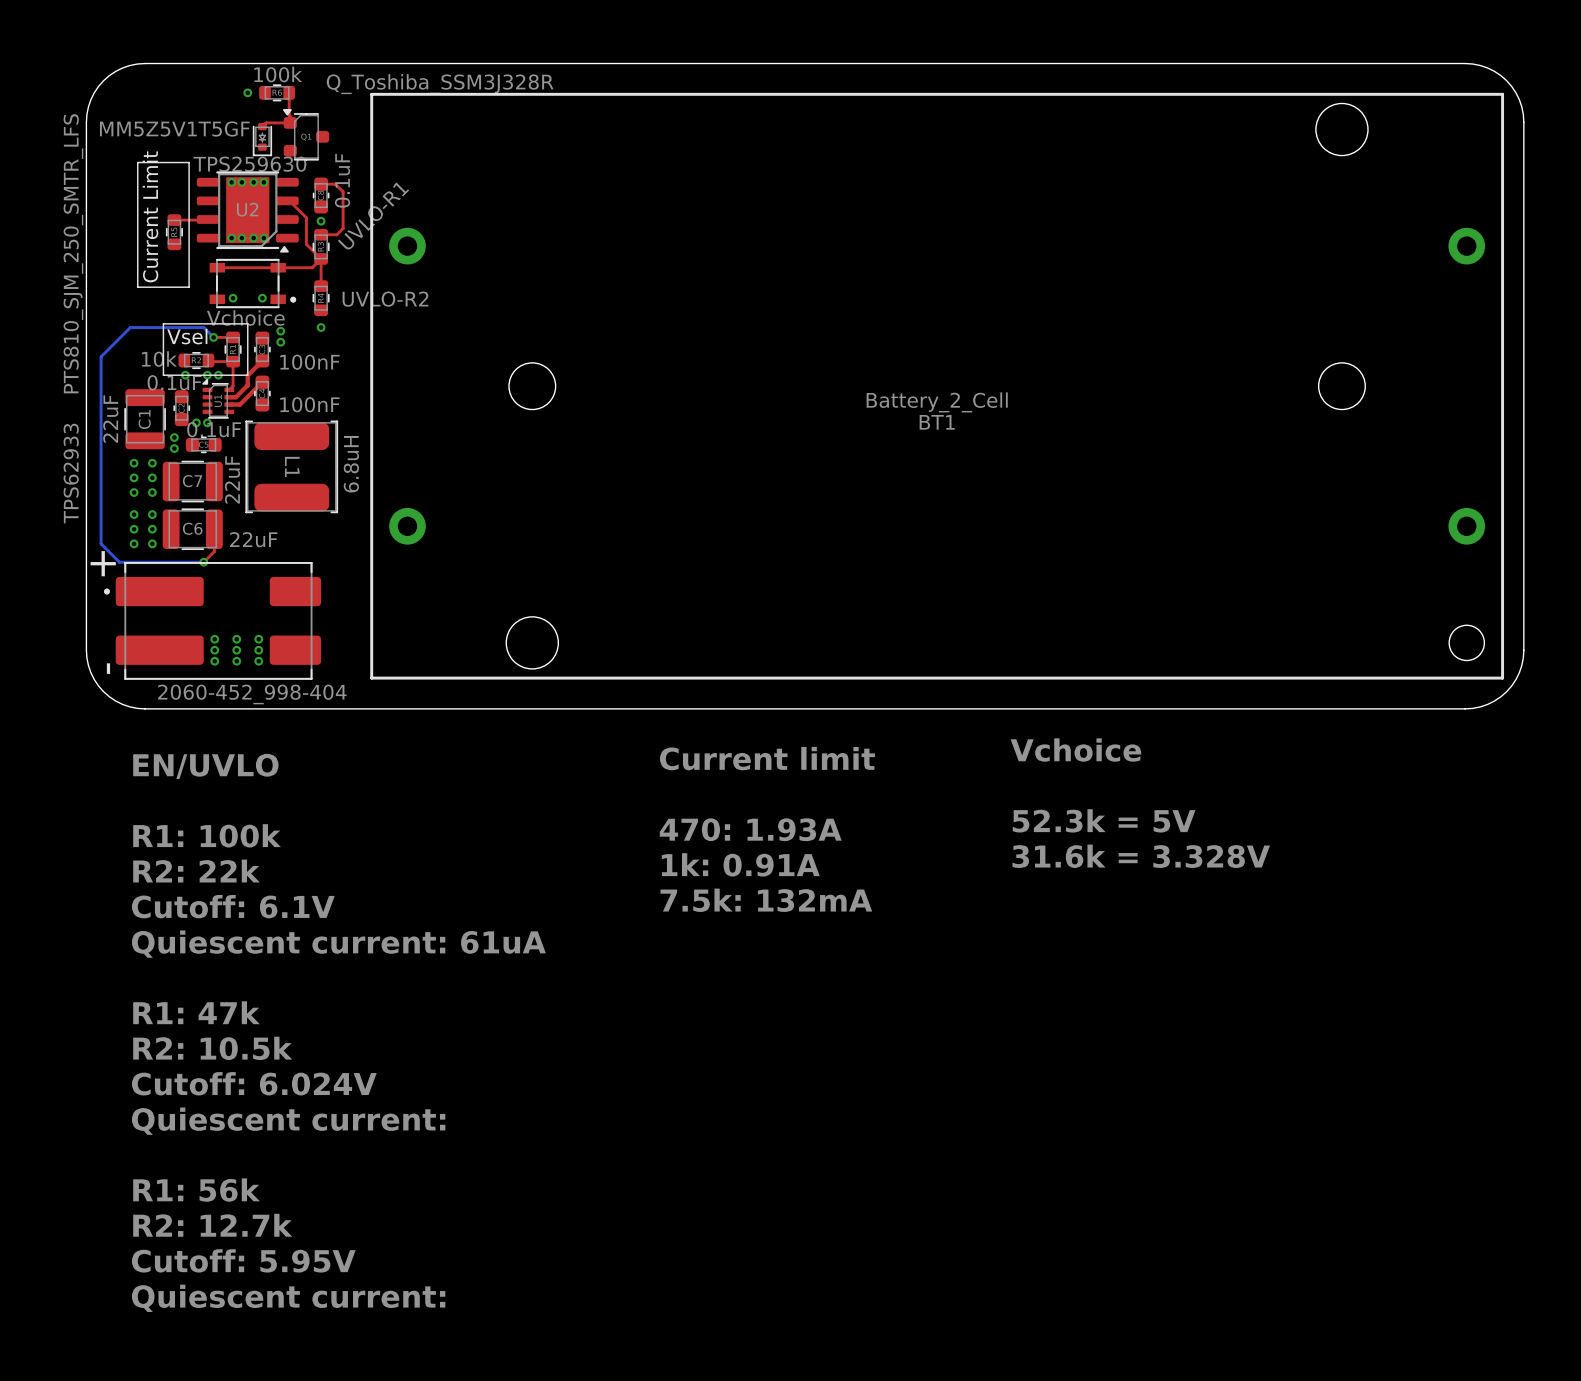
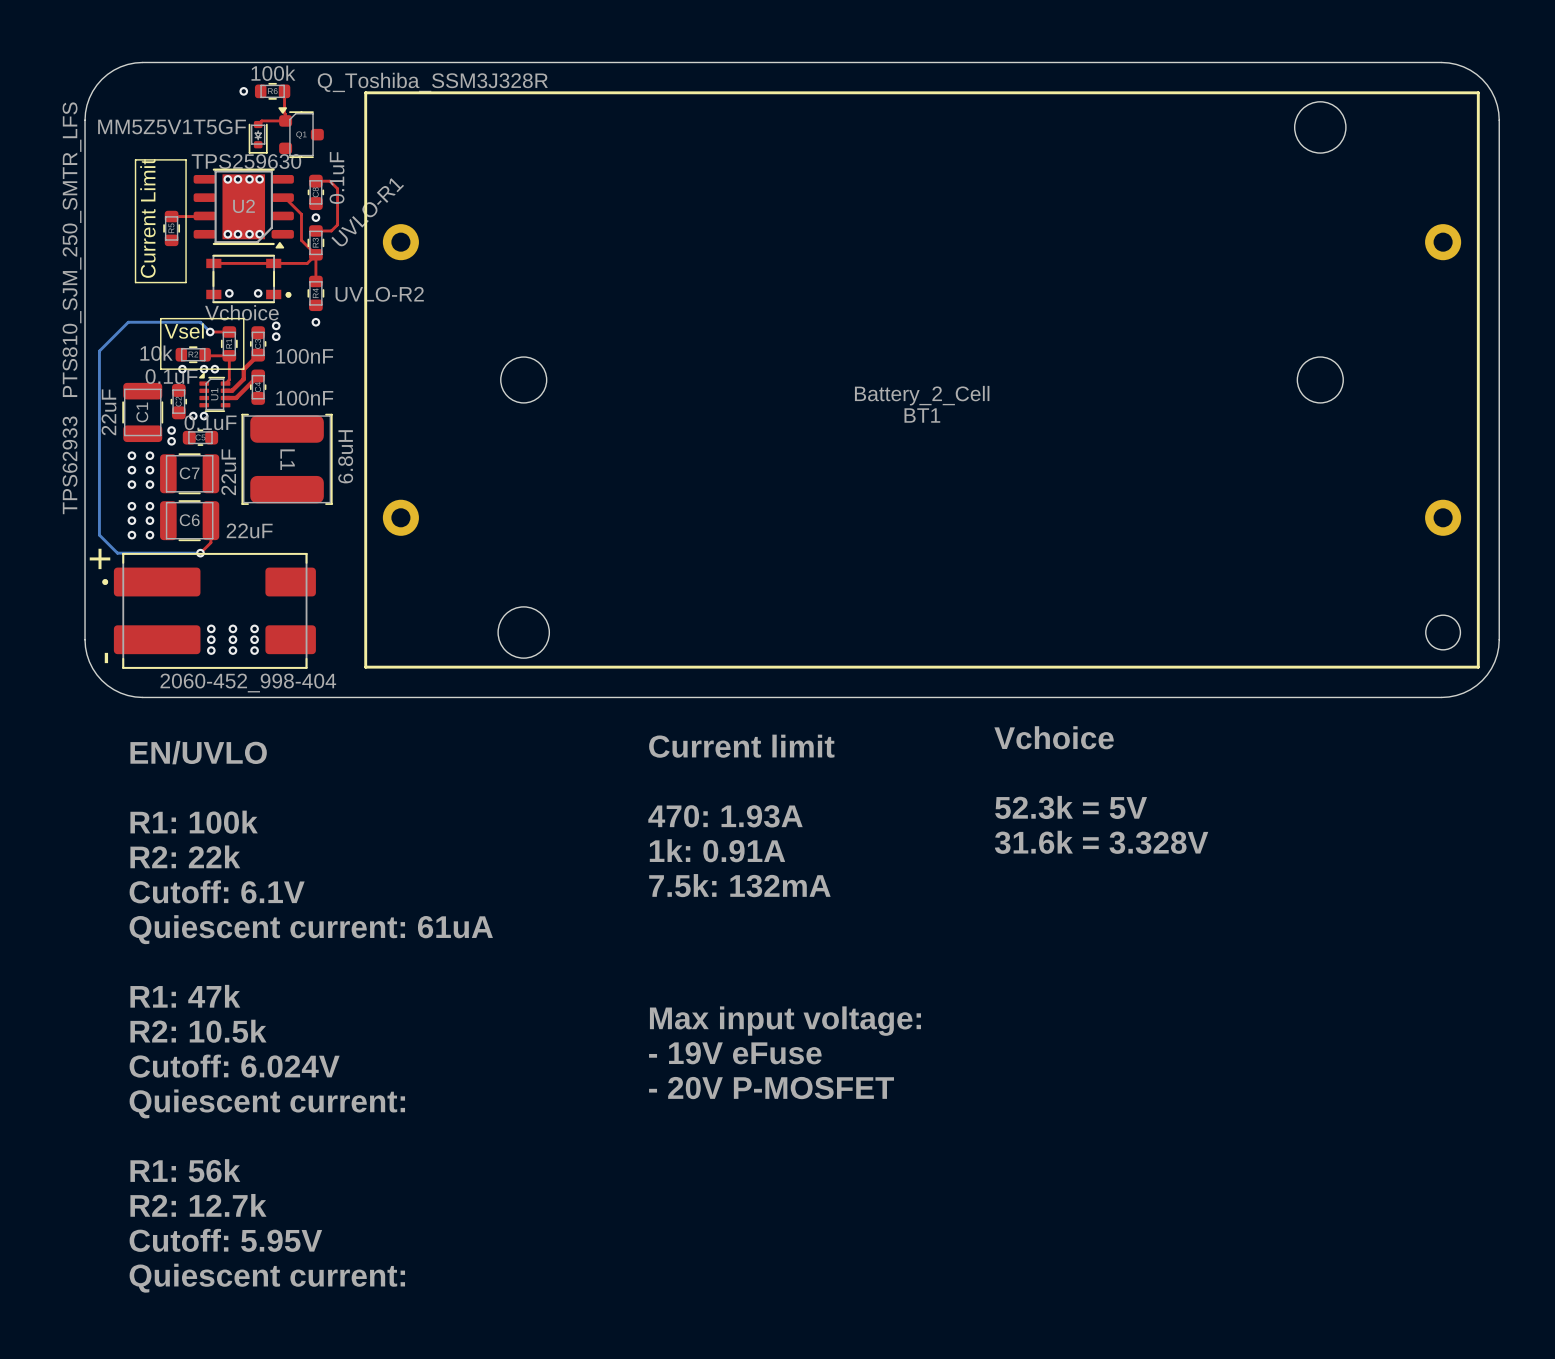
text: none -> Max input voltage: (785, 1021)
text: none -> - 19V eFuse (735, 1053)
text: none -> - 20V P-MOSFET (771, 1088)

